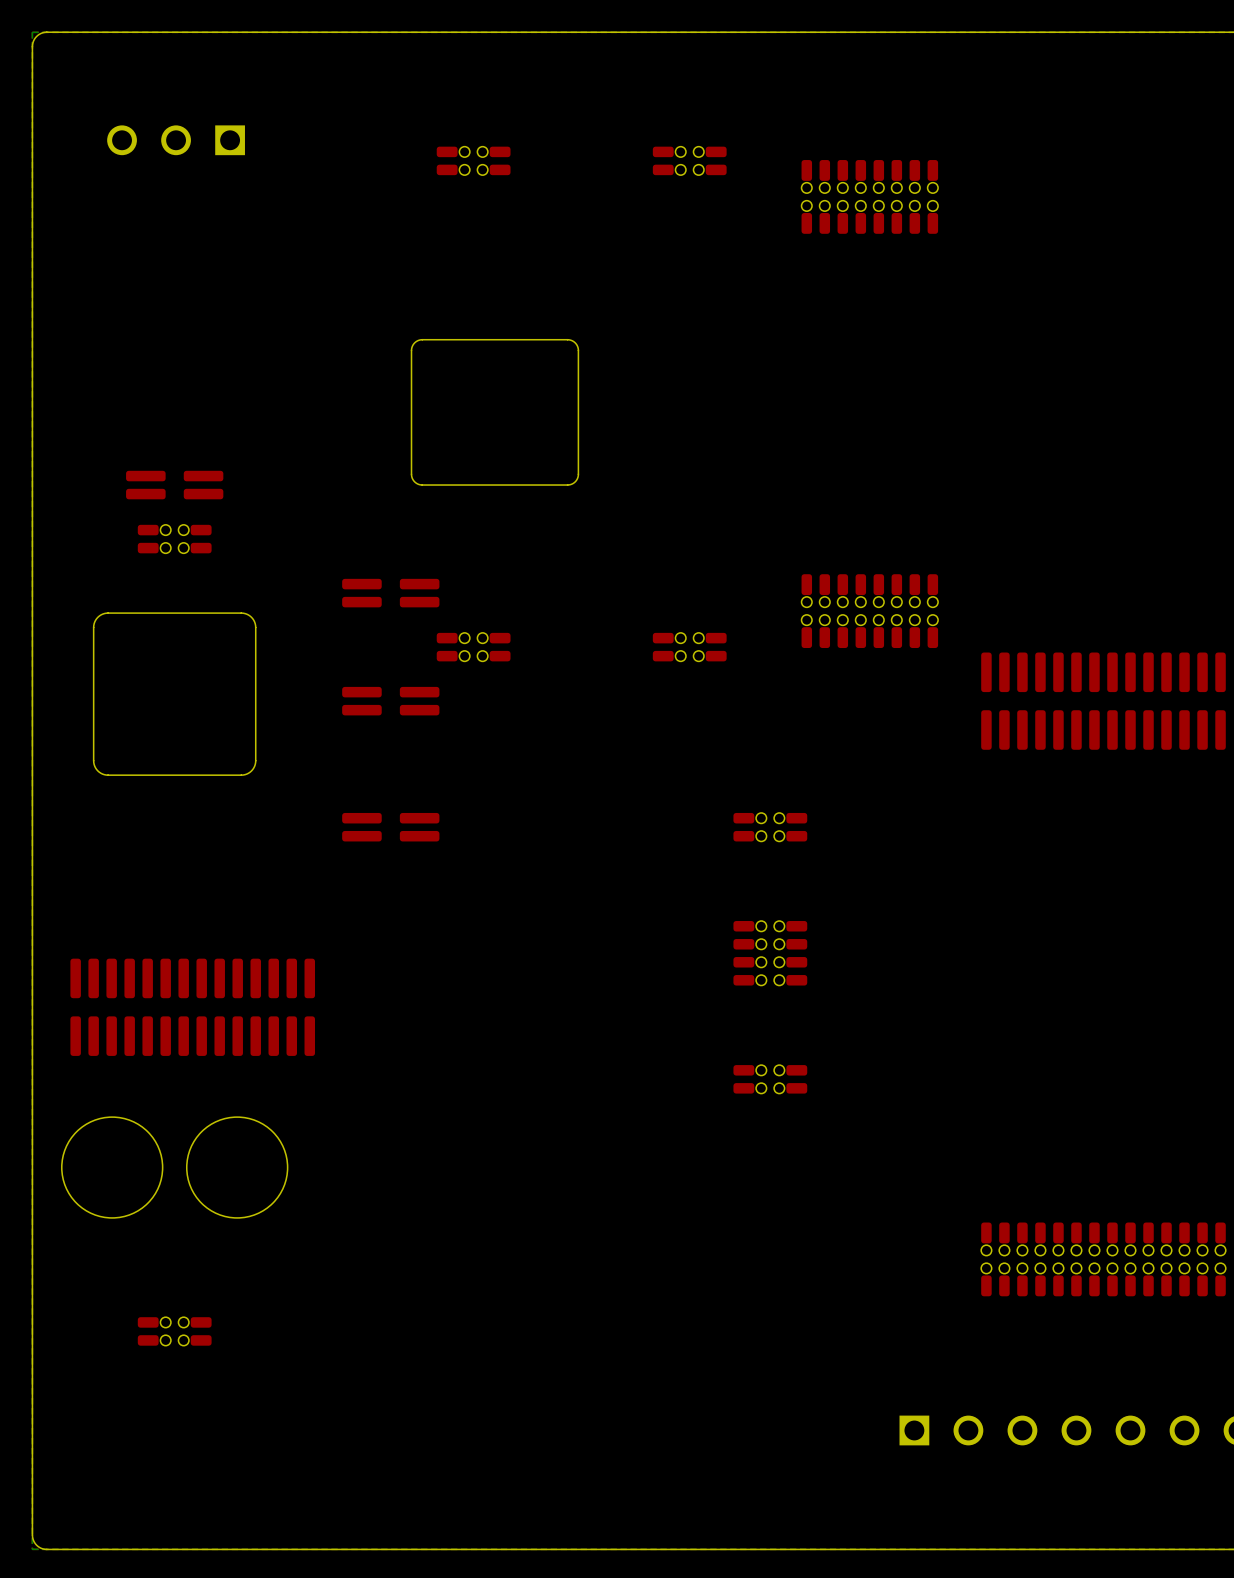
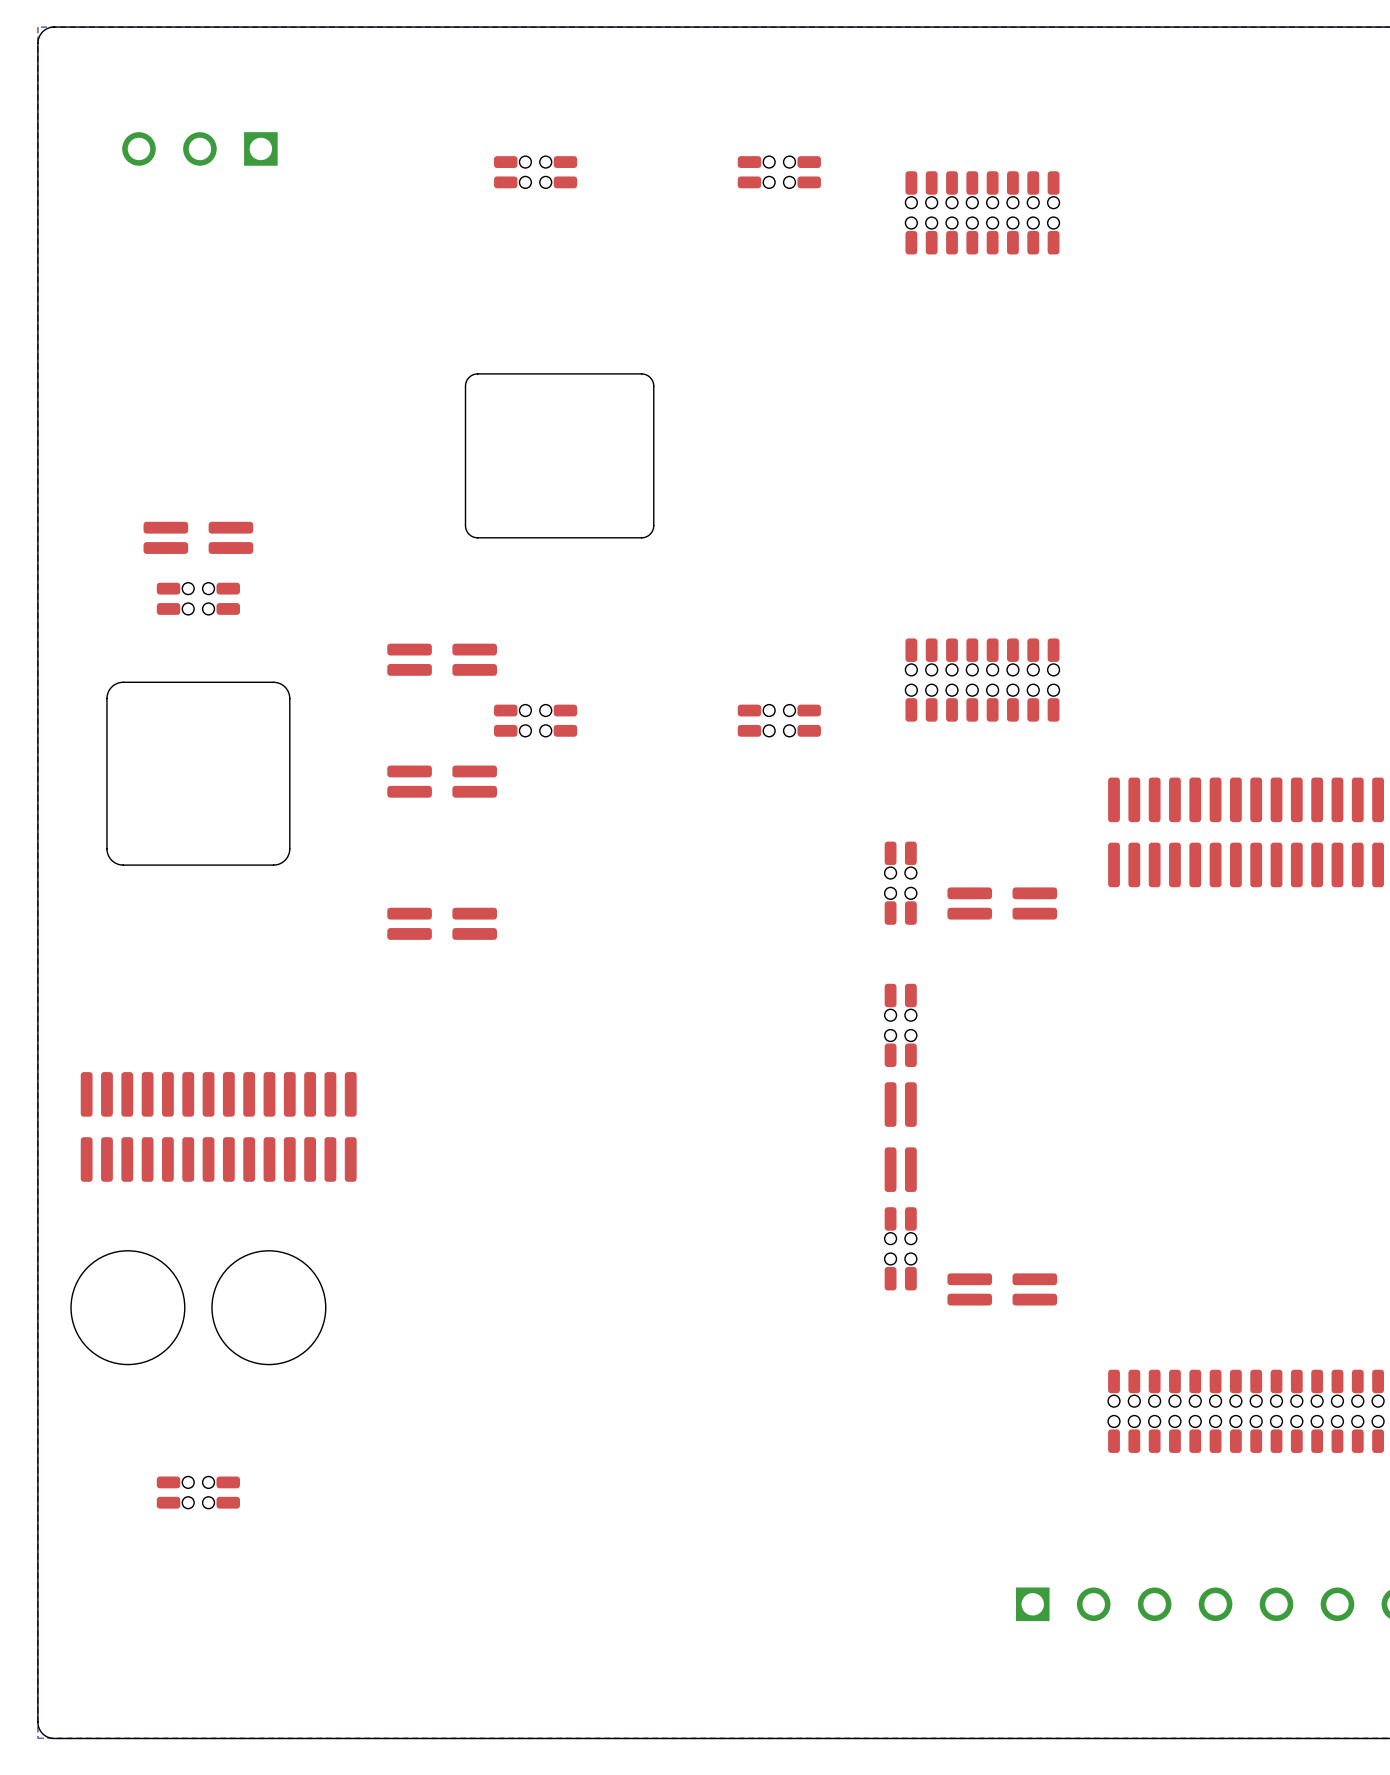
part position: (1103, 701) -> (1246, 832)
part: none -> (1002, 903)
part rotation: 0° (770, 827) -> 90° clockwise (900, 883)
part position: (770, 827) -> (900, 883)
part: none -> (900, 1025)
part: (770, 953) -> none
part: none -> (900, 1137)
part rotation: 0° (770, 1079) -> 90° clockwise (900, 1248)
part position: (770, 1079) -> (900, 1248)
part: none -> (1002, 1289)

